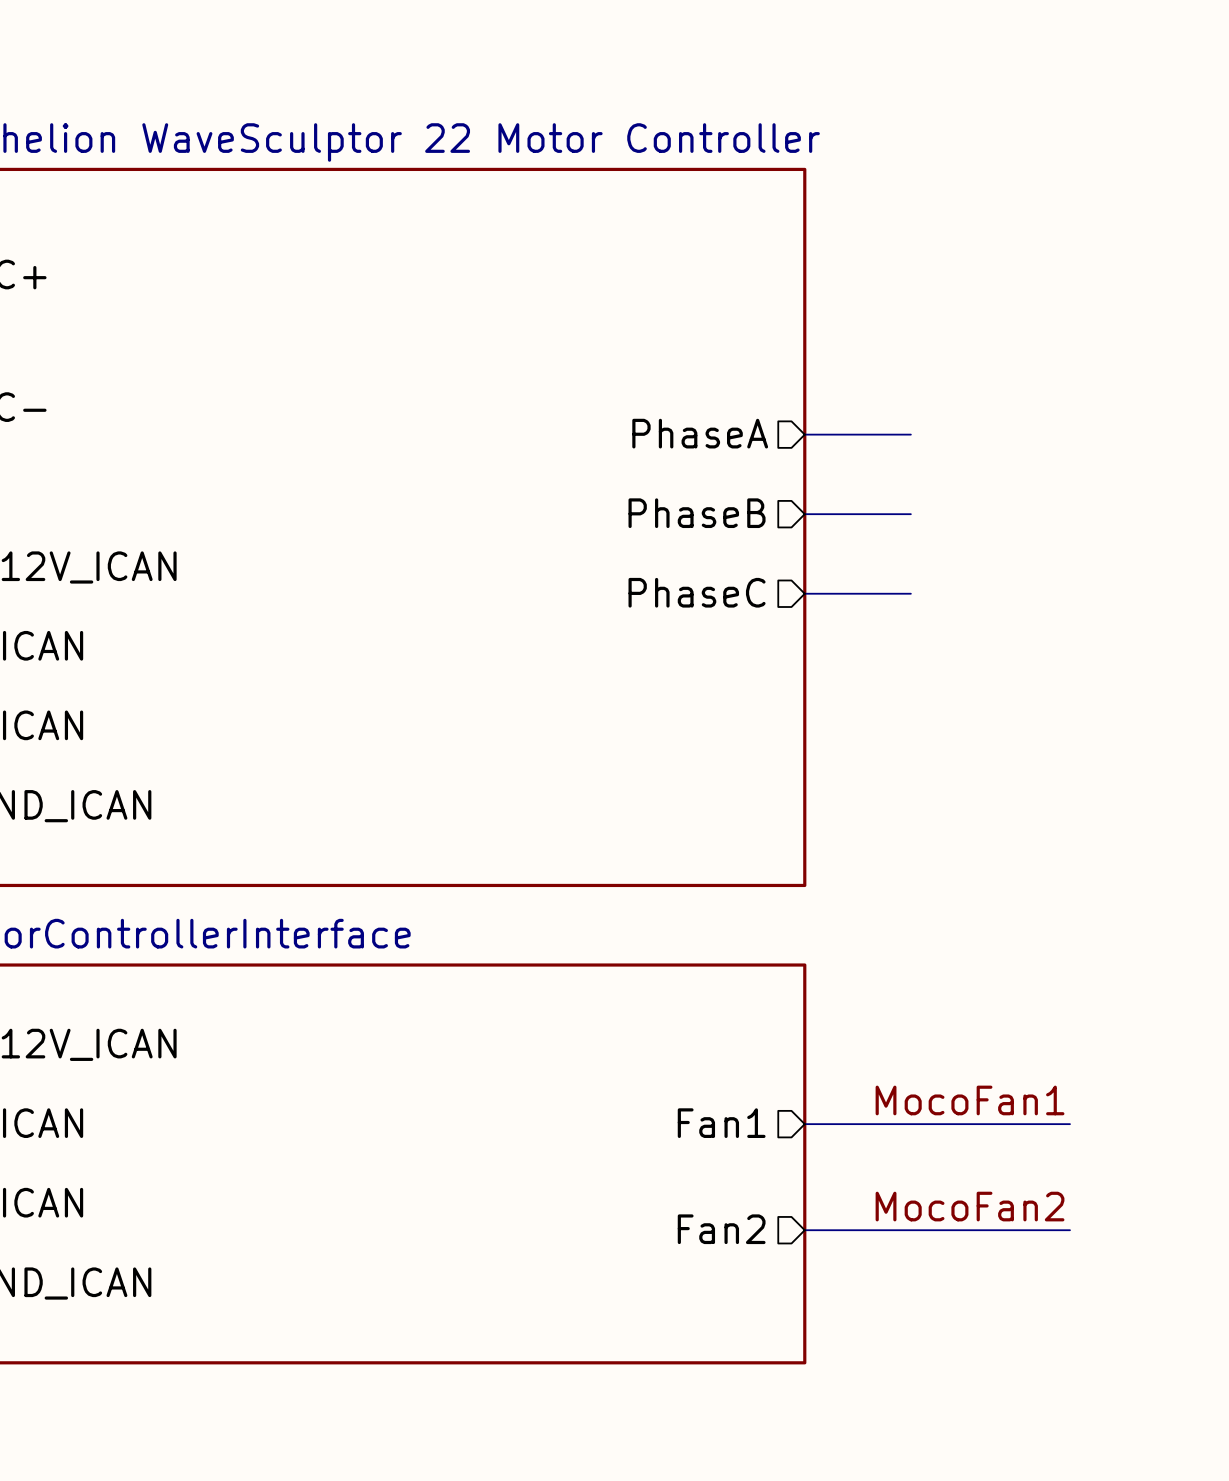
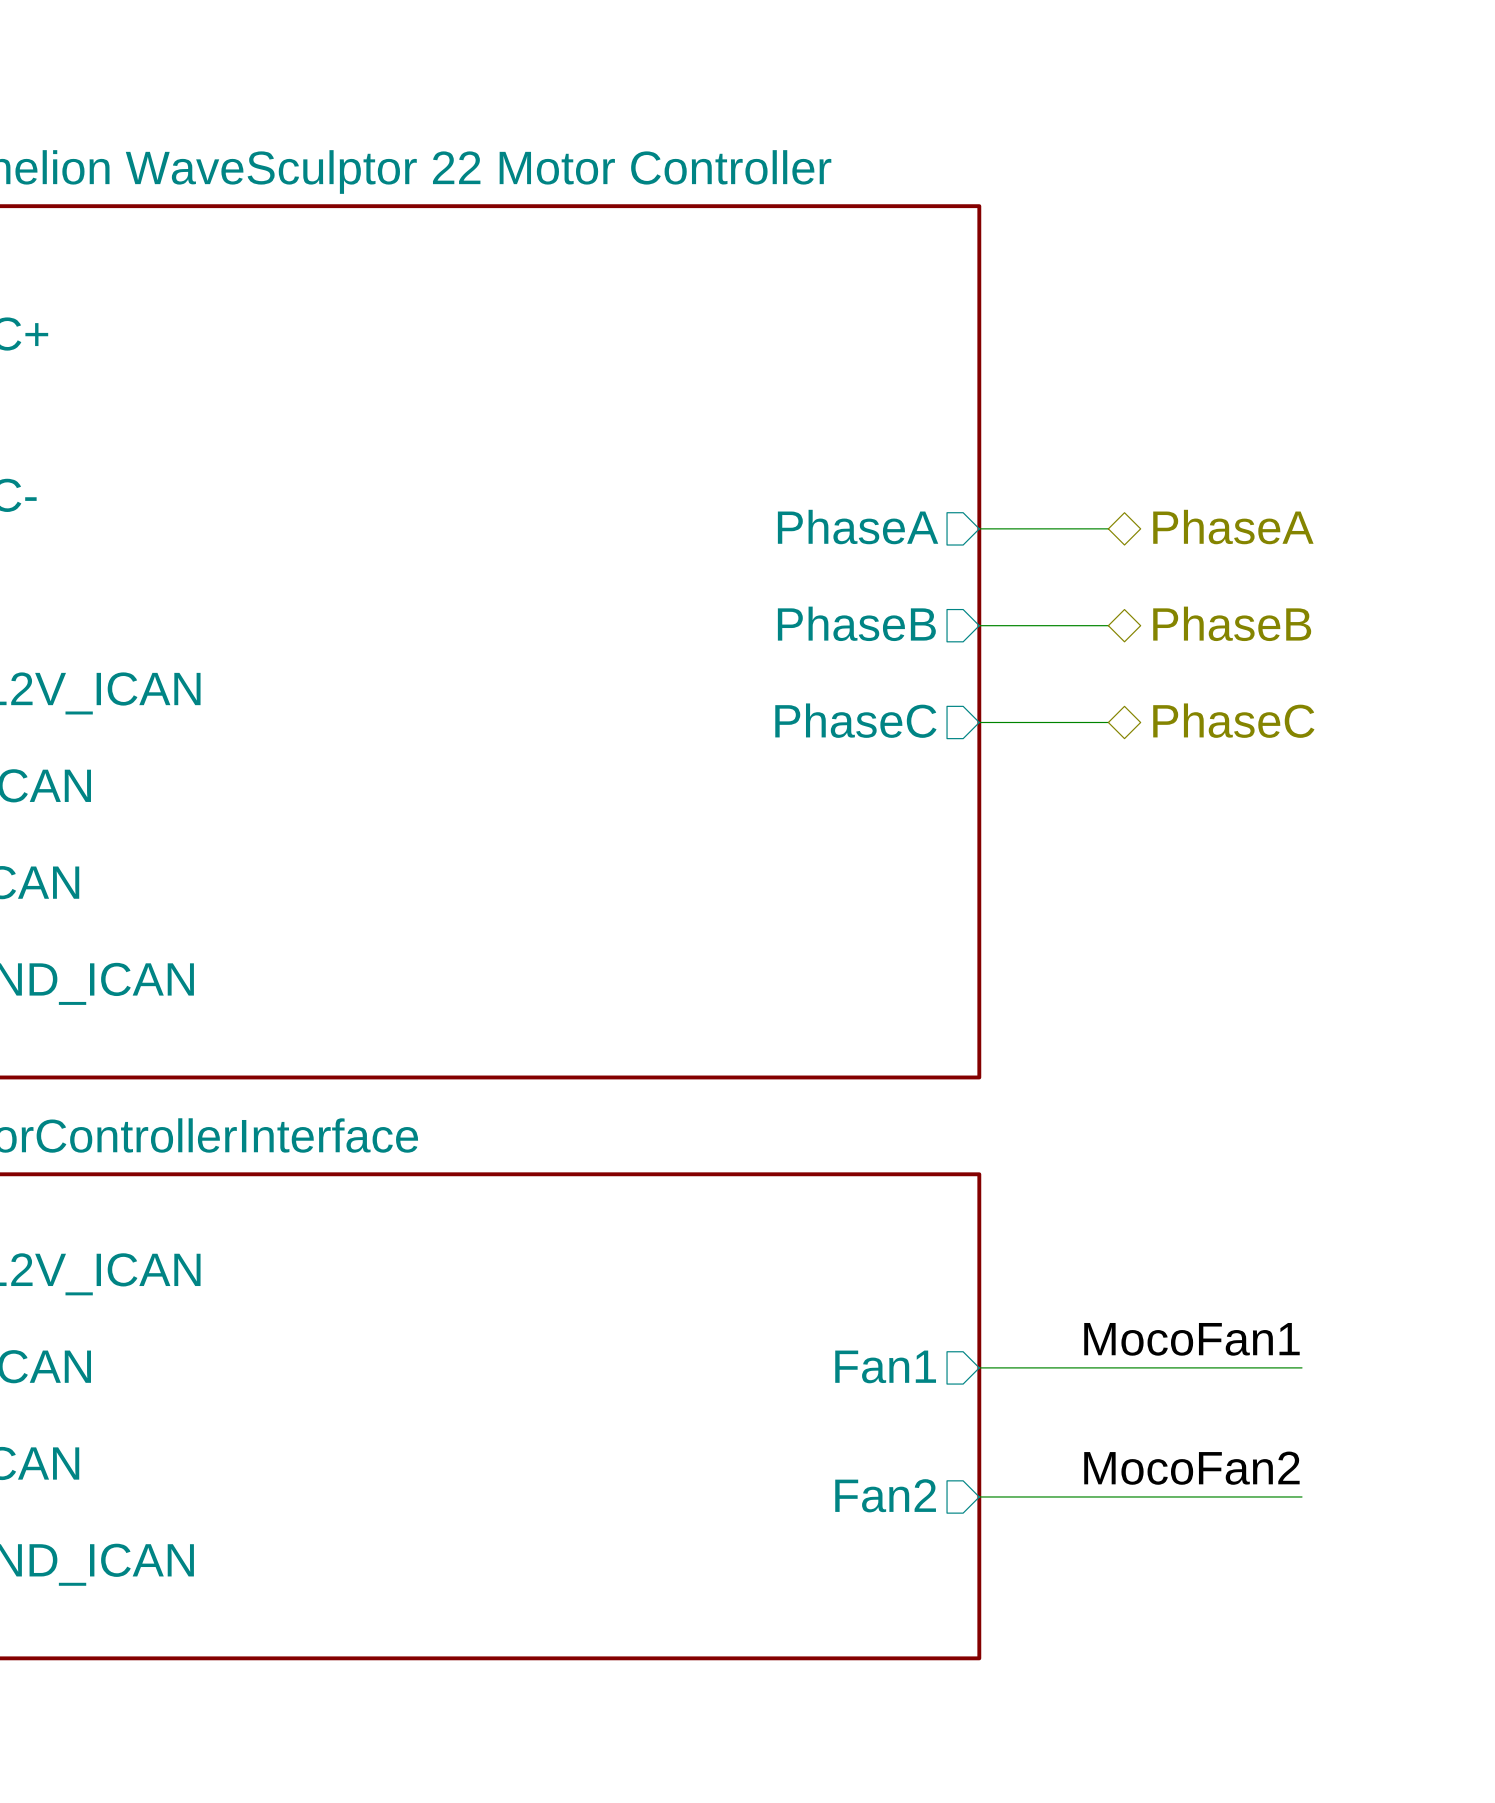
hierarchical label: none -> PhaseA (1233, 527)
hierarchical label: none -> PhaseB (1232, 623)
hierarchical label: none -> PhaseC (1233, 720)

